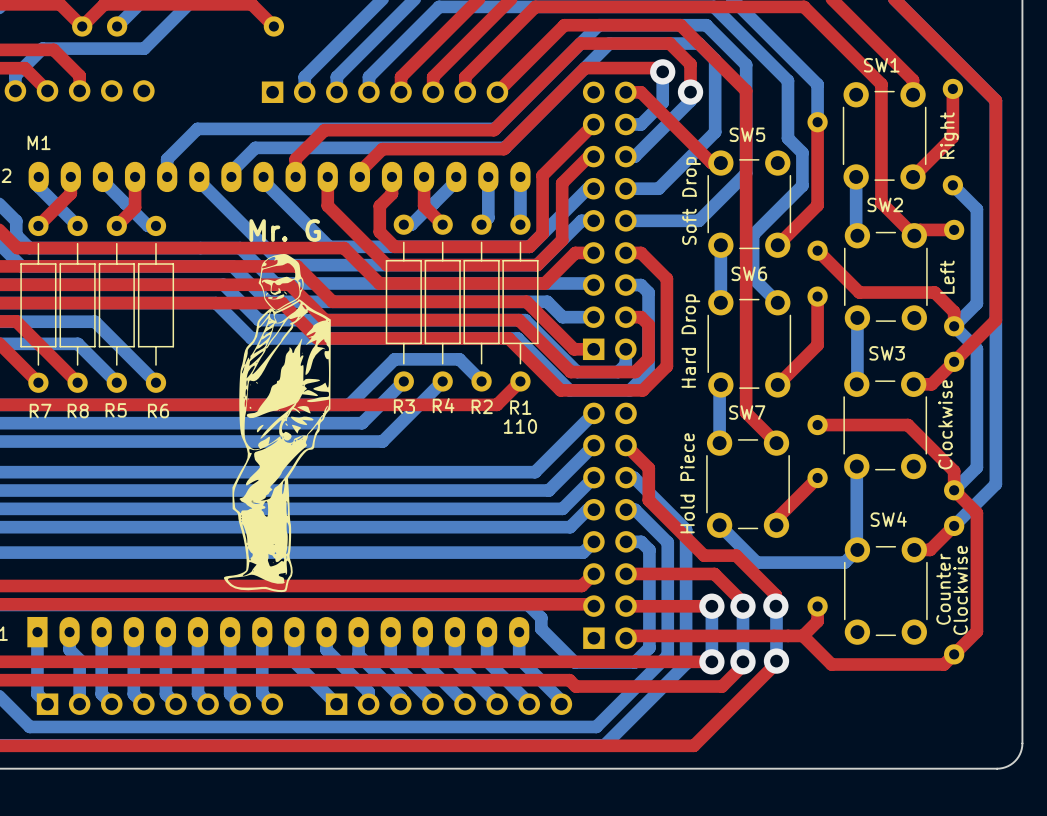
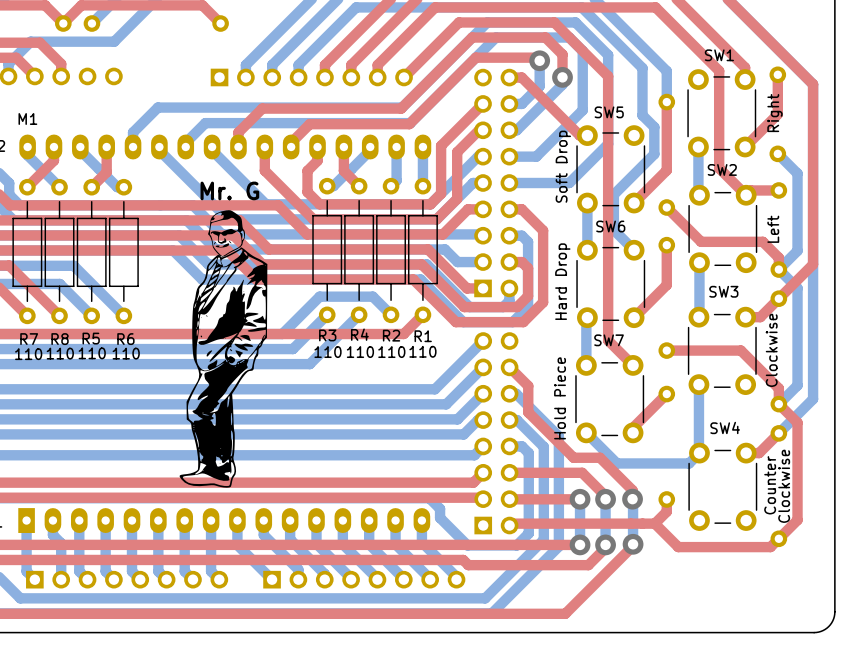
R3 value: none -> 110 (328, 352)
R4 value: none -> 110 (360, 352)
R2 value: none -> 110 (391, 352)
R8 value: none -> 110 (60, 353)
R5 value: none -> 110 (92, 353)
R6 value: none -> 110 (126, 353)
R7 value: none -> 110 (28, 354)

